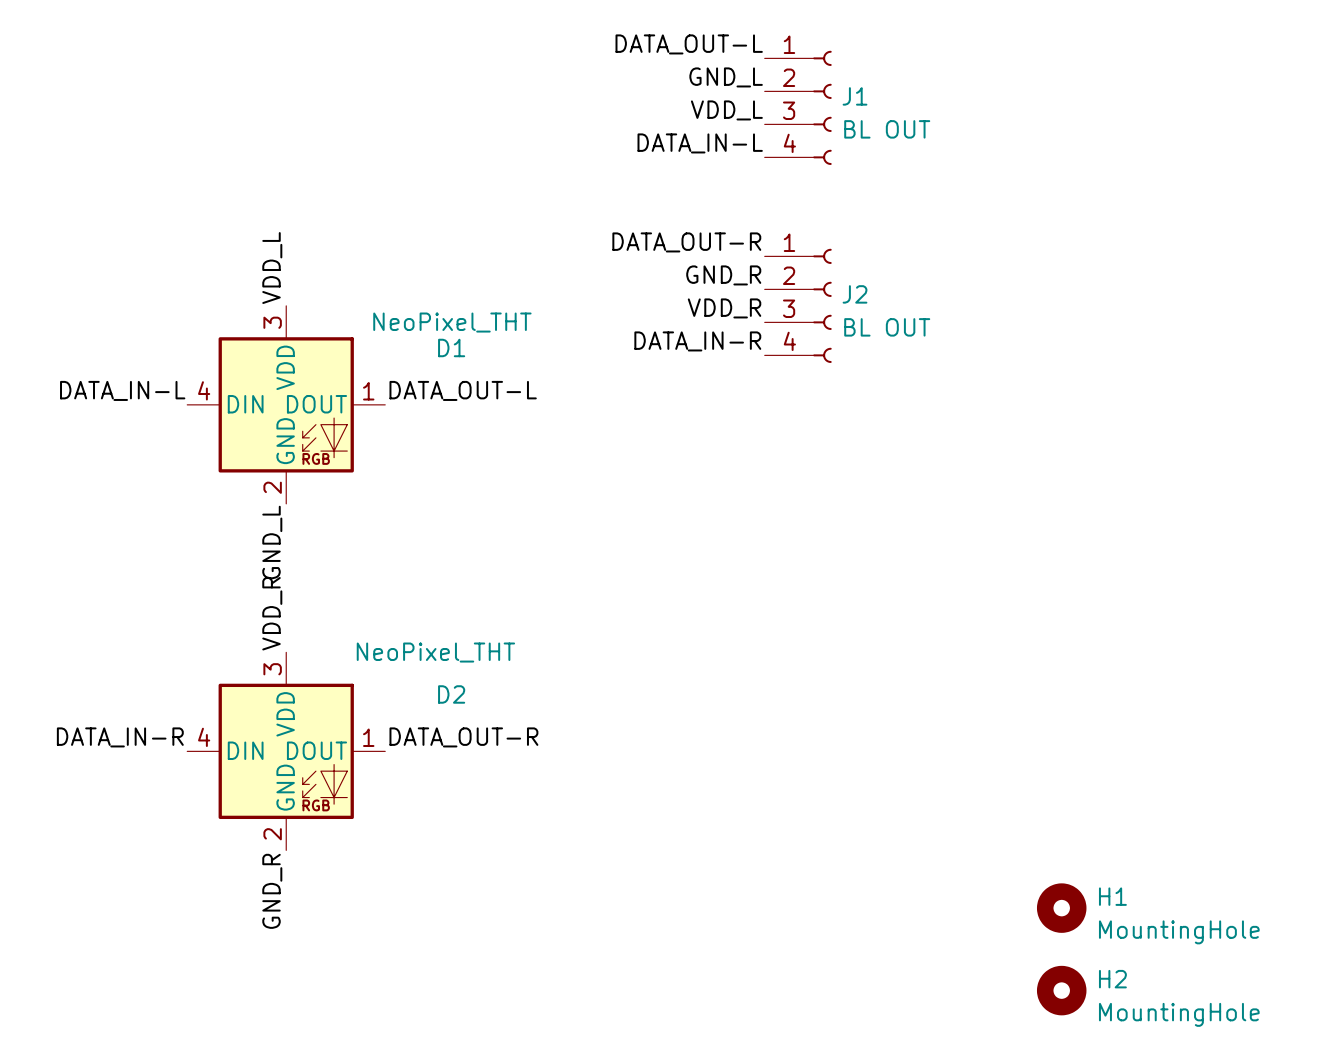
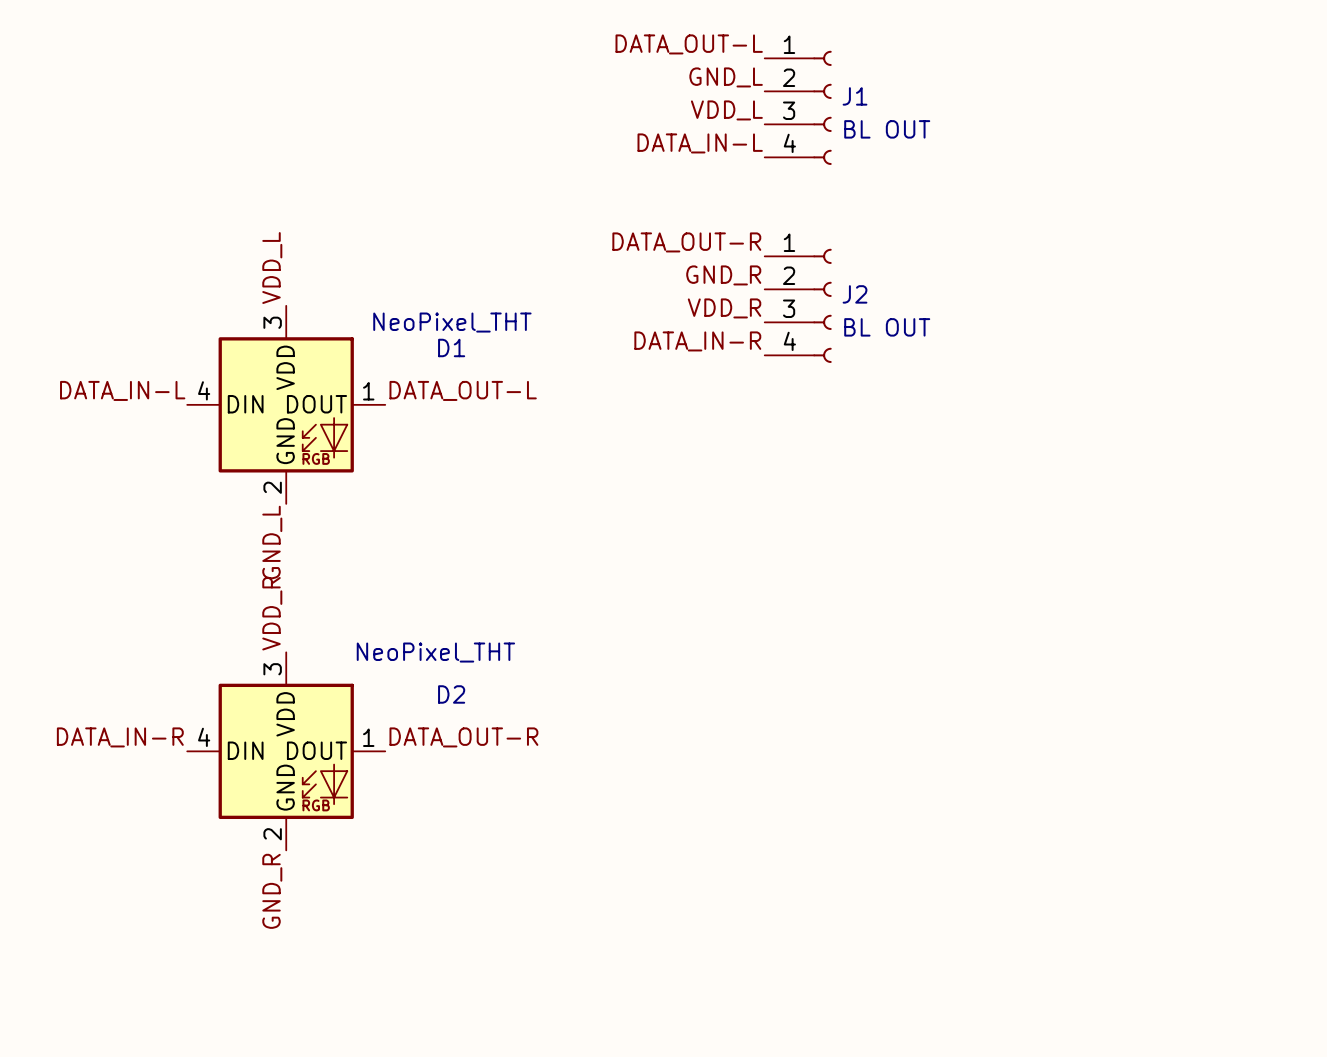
H1: MountingHole (1061, 908) -> none
H2: MountingHole (1061, 990) -> none

